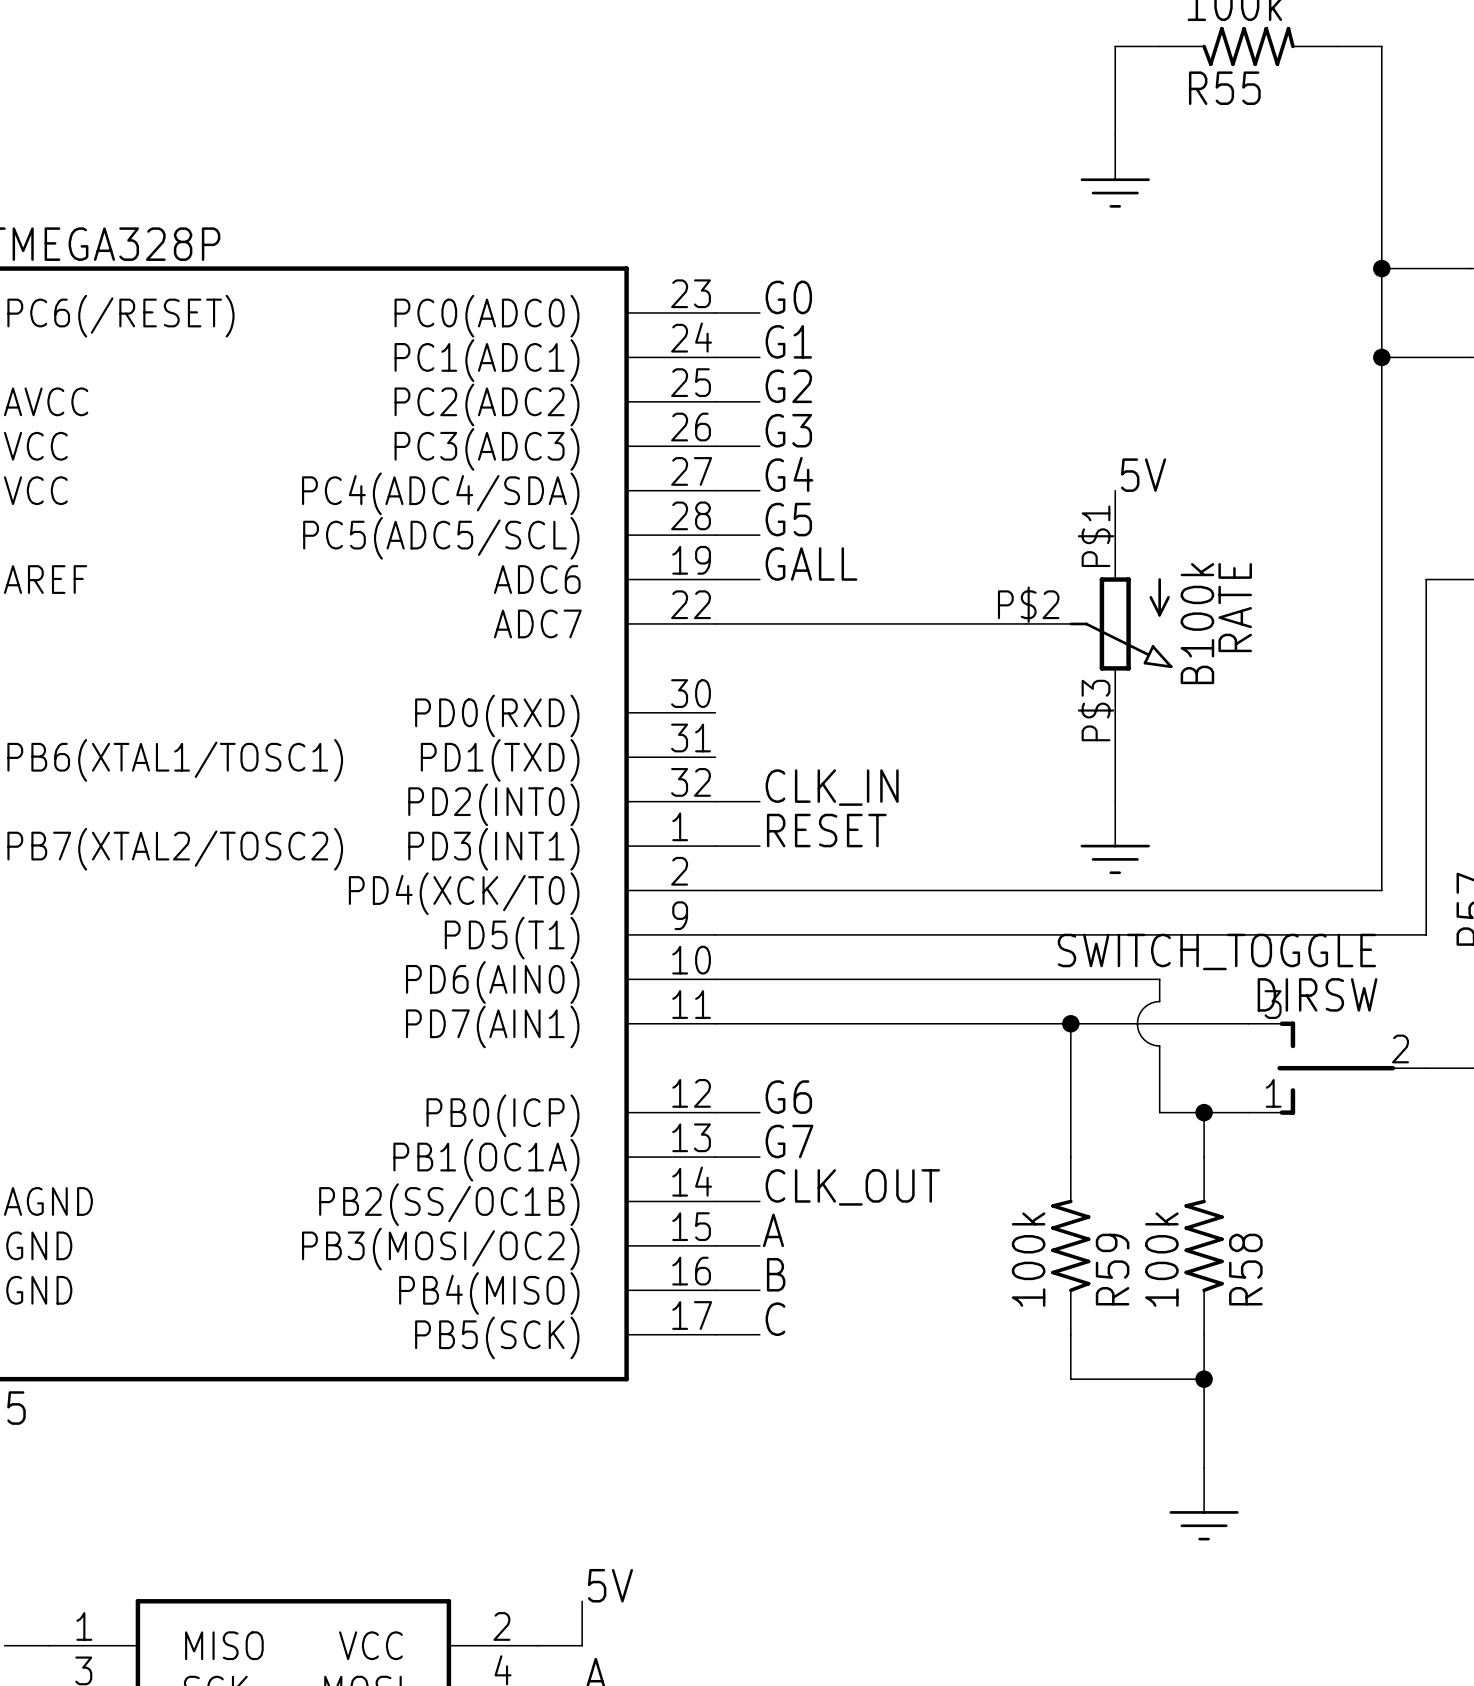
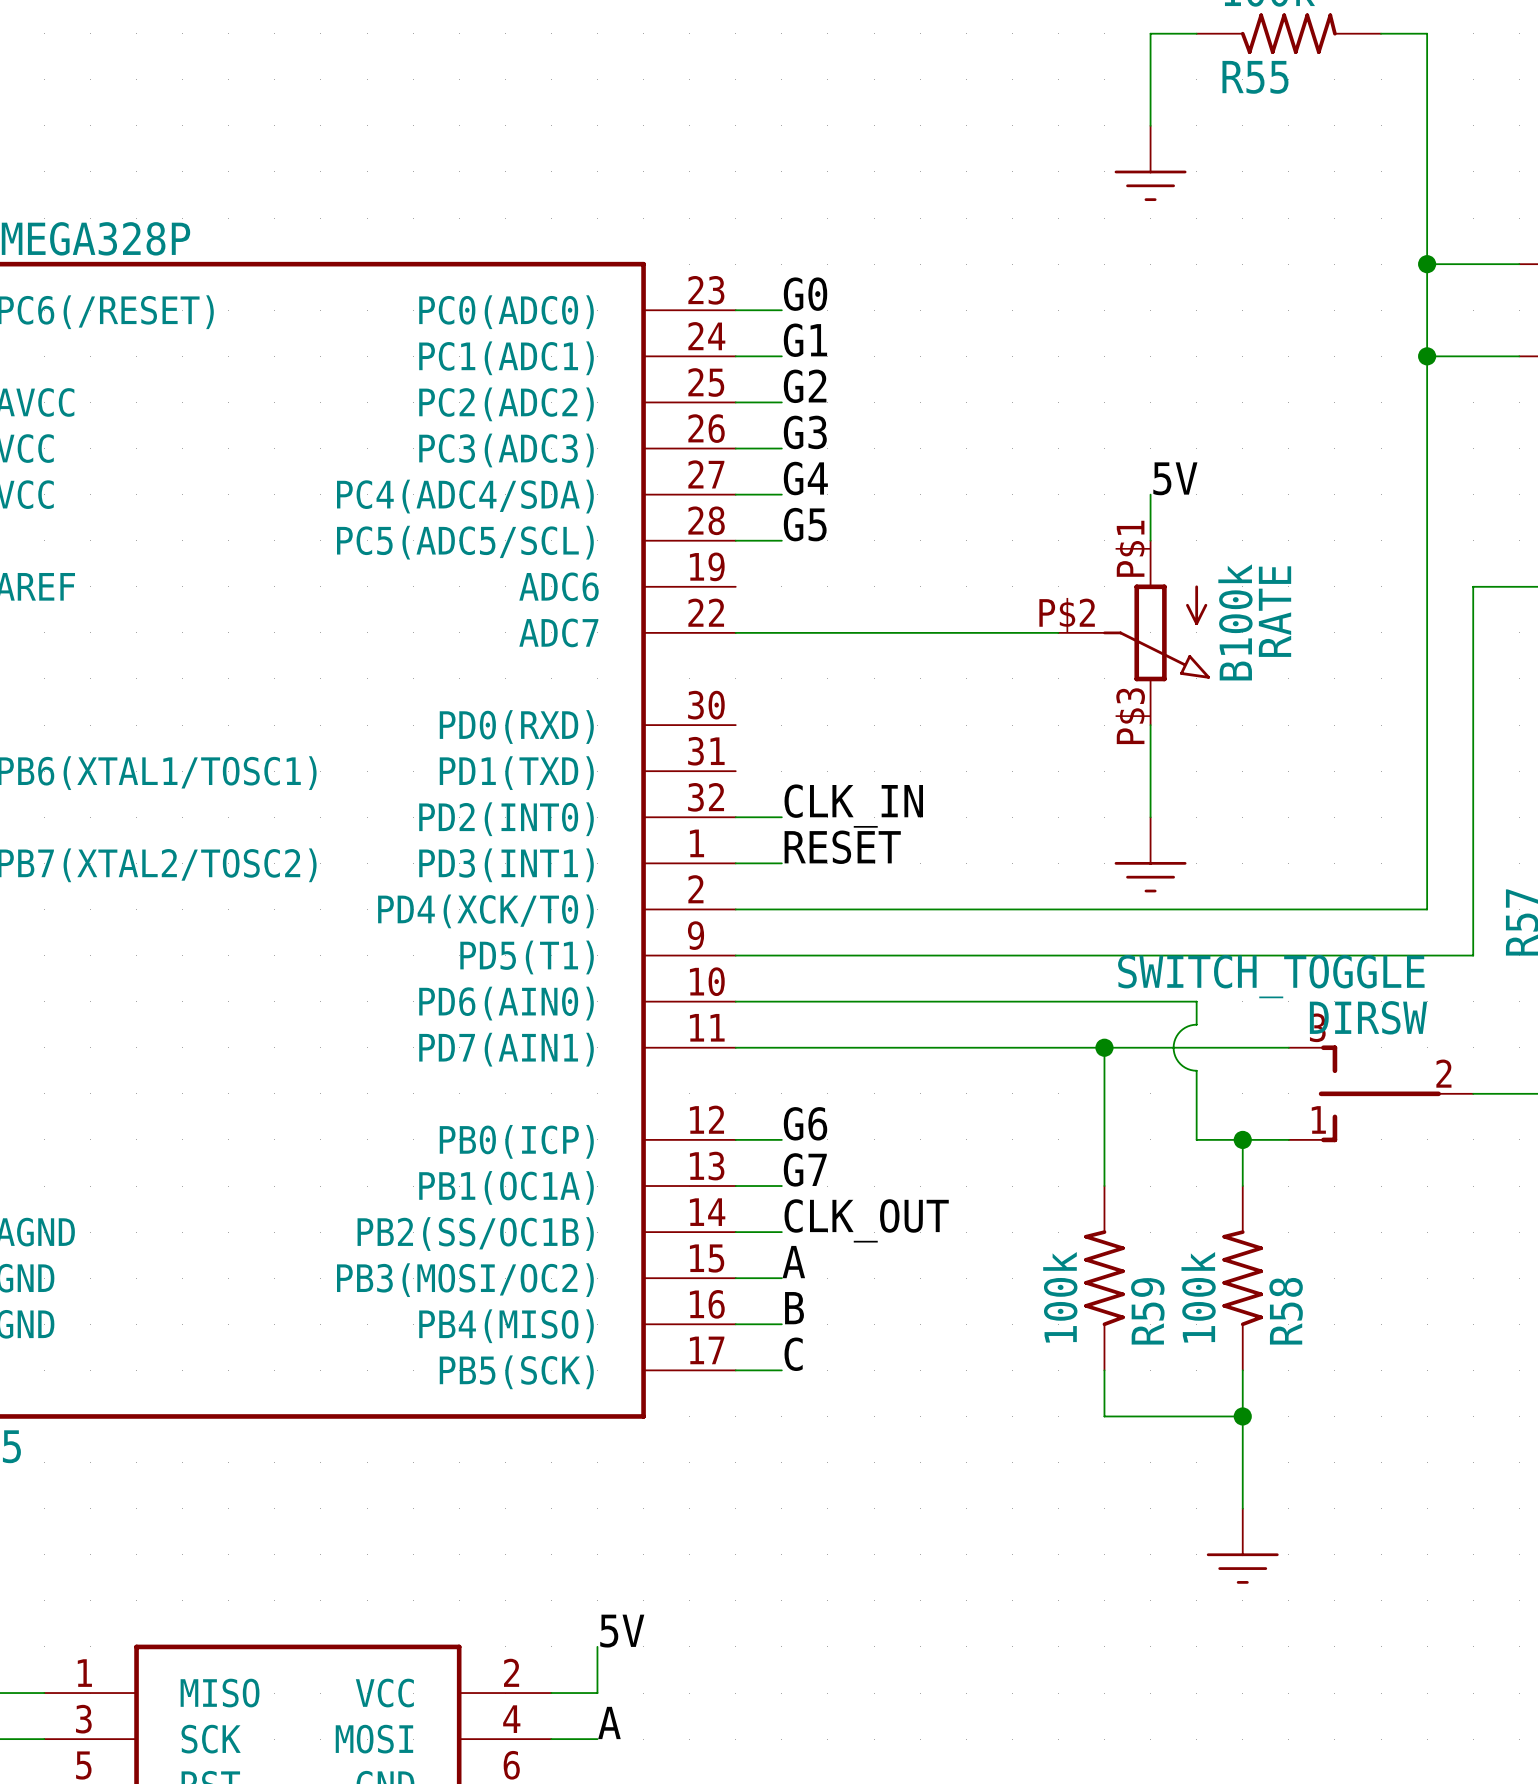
label: GALL (811, 563) -> none
wire: (715, 579) (759, 579) -> none

